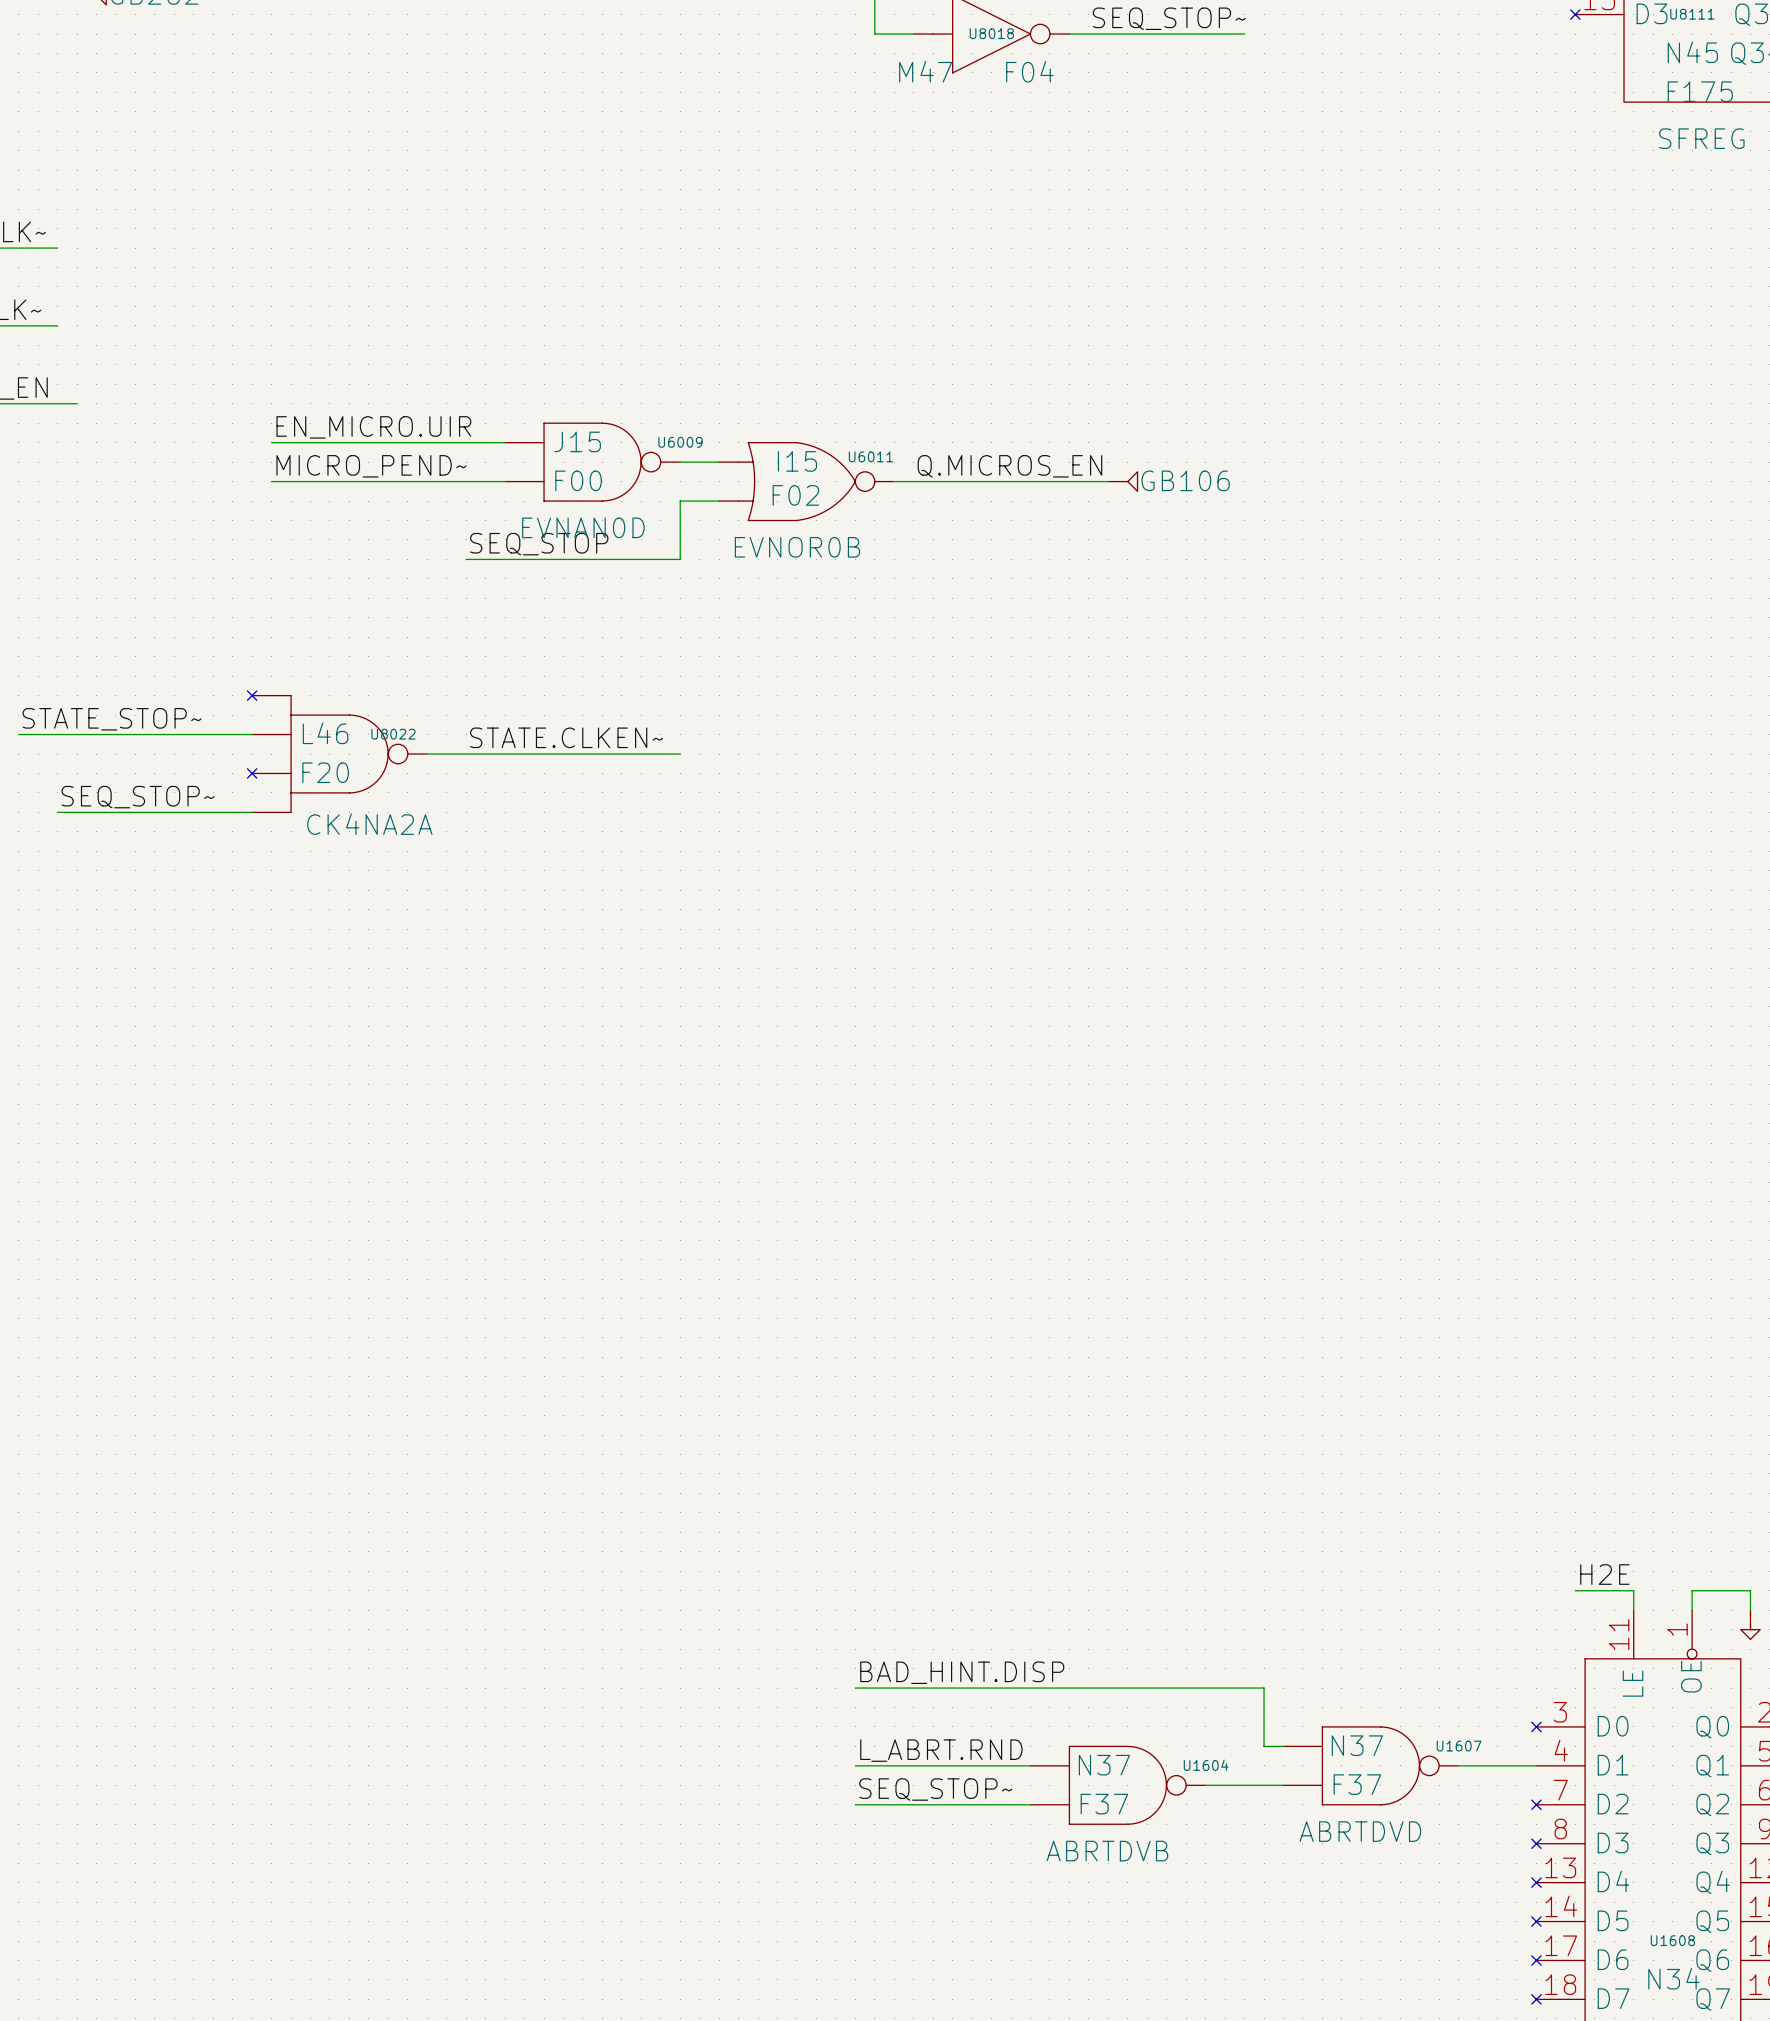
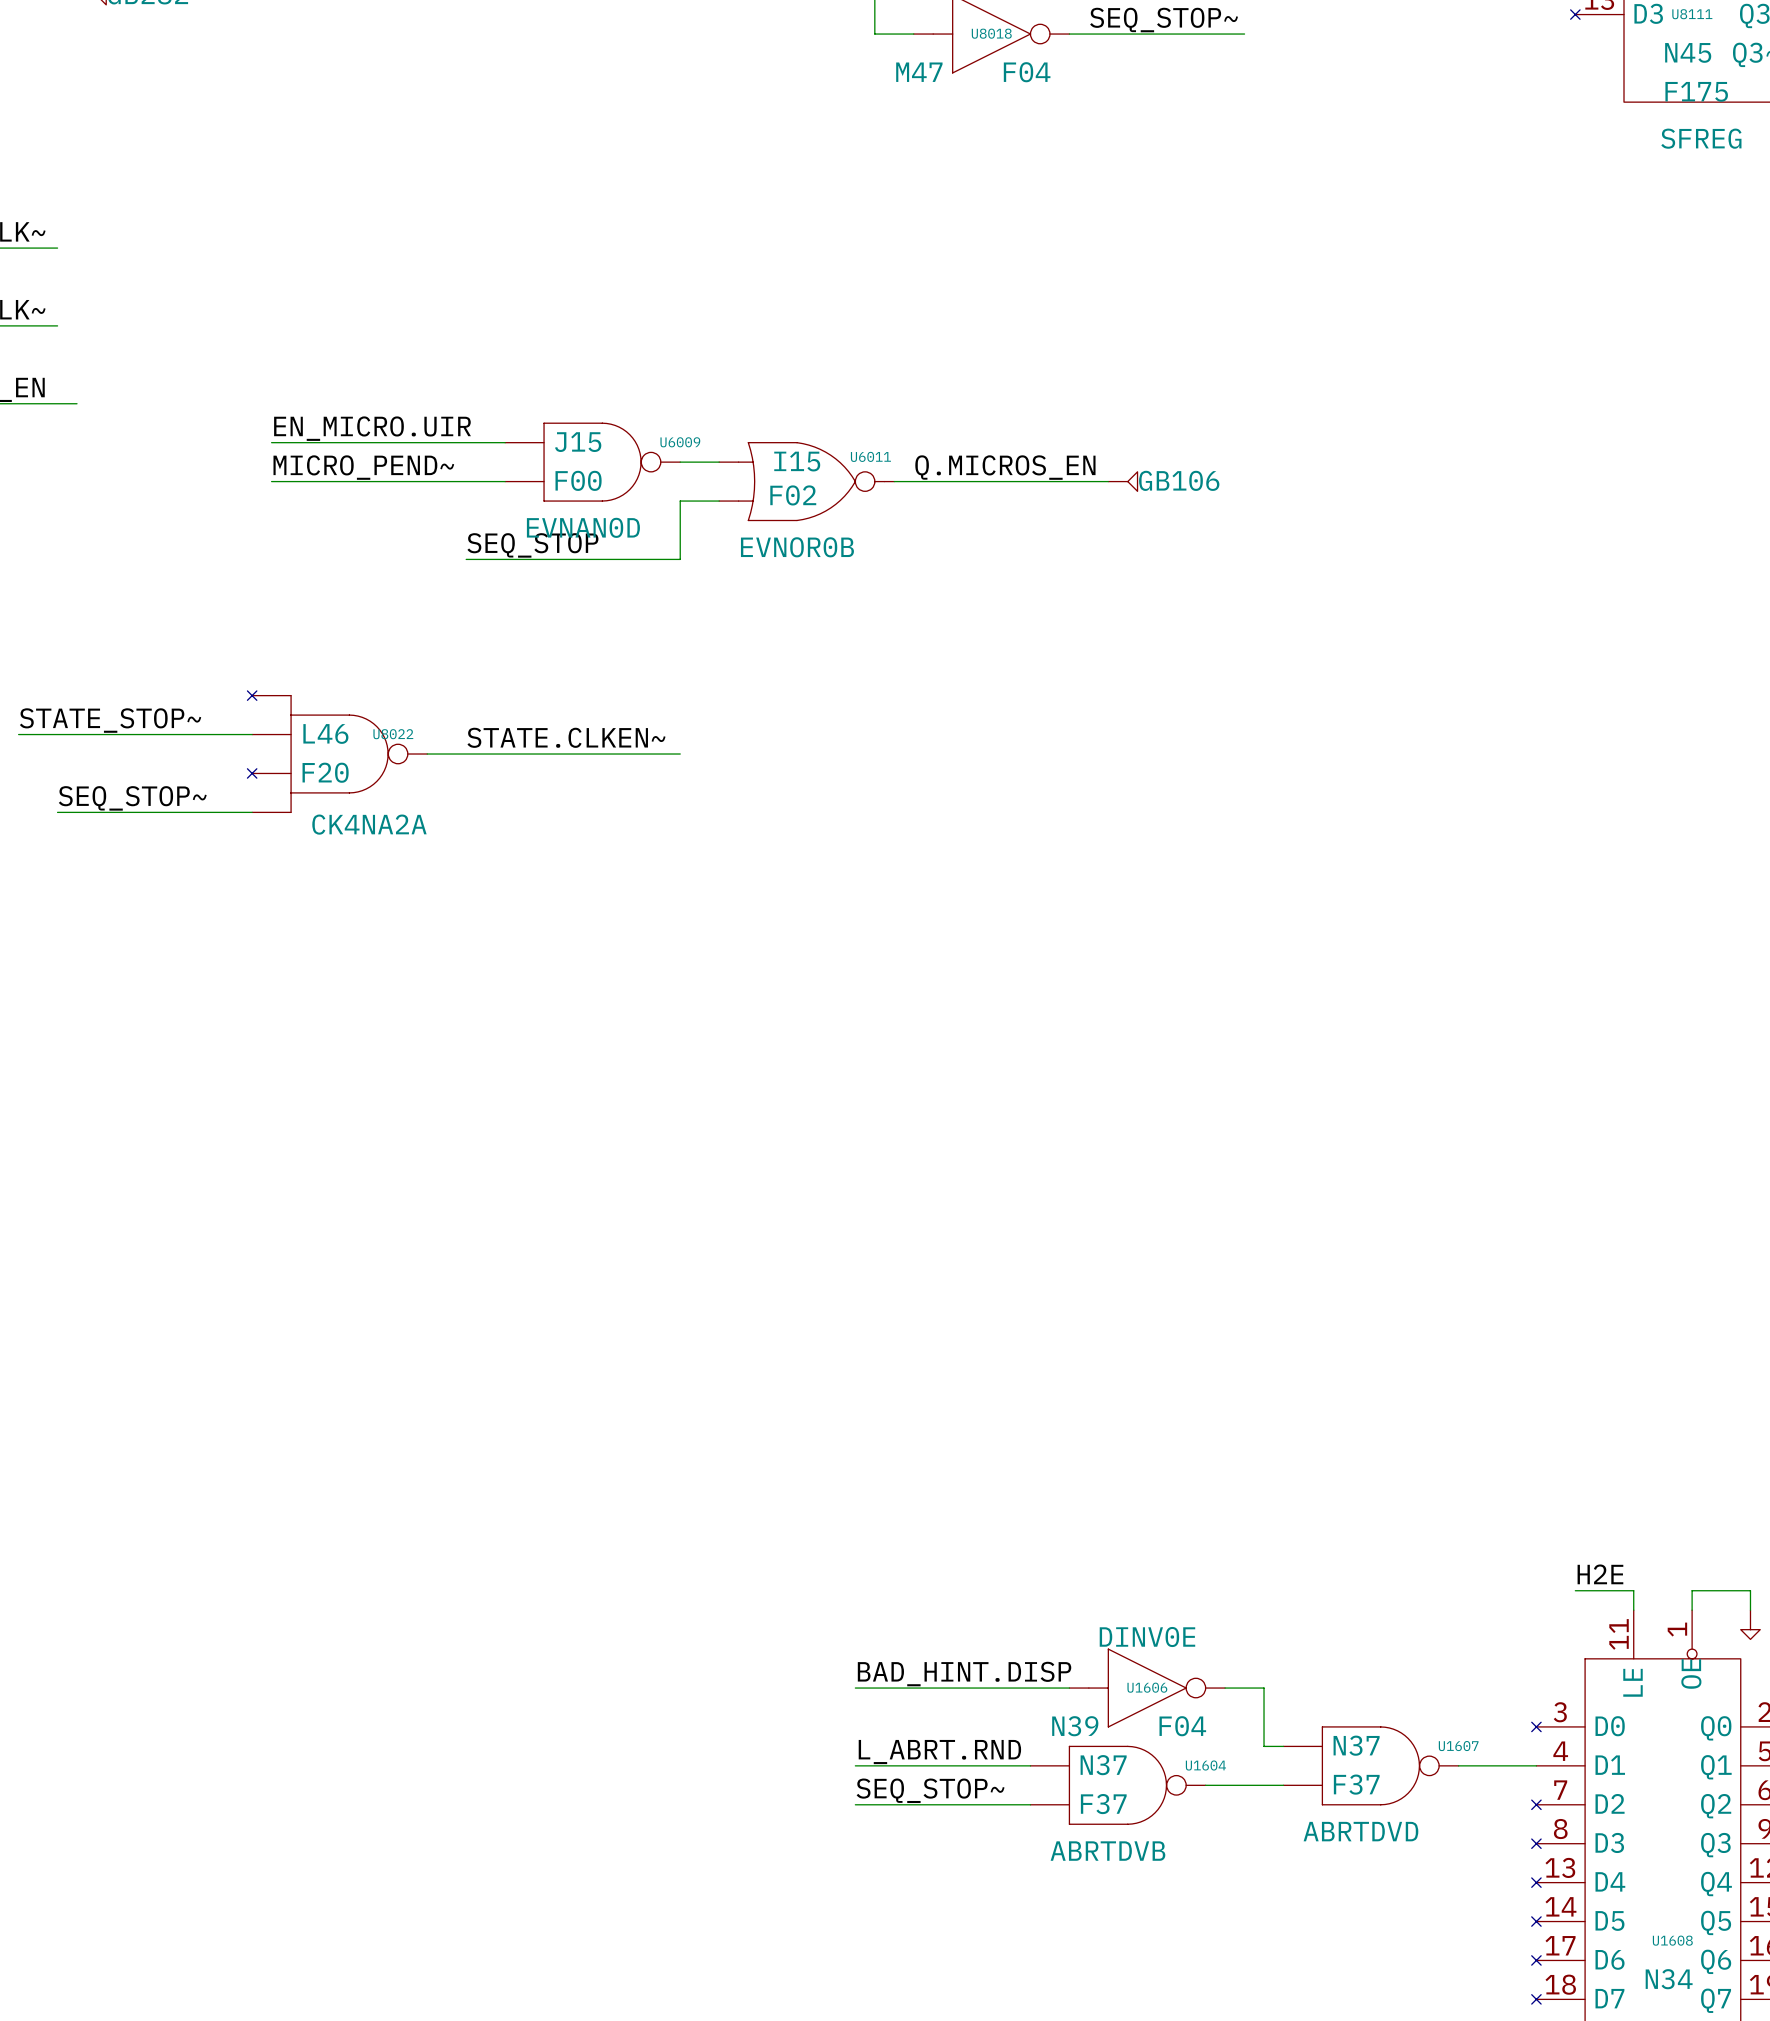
wire: (1069, 1688) (1225, 1688) -> none
U1606: none -> F04 (1147, 1688)

